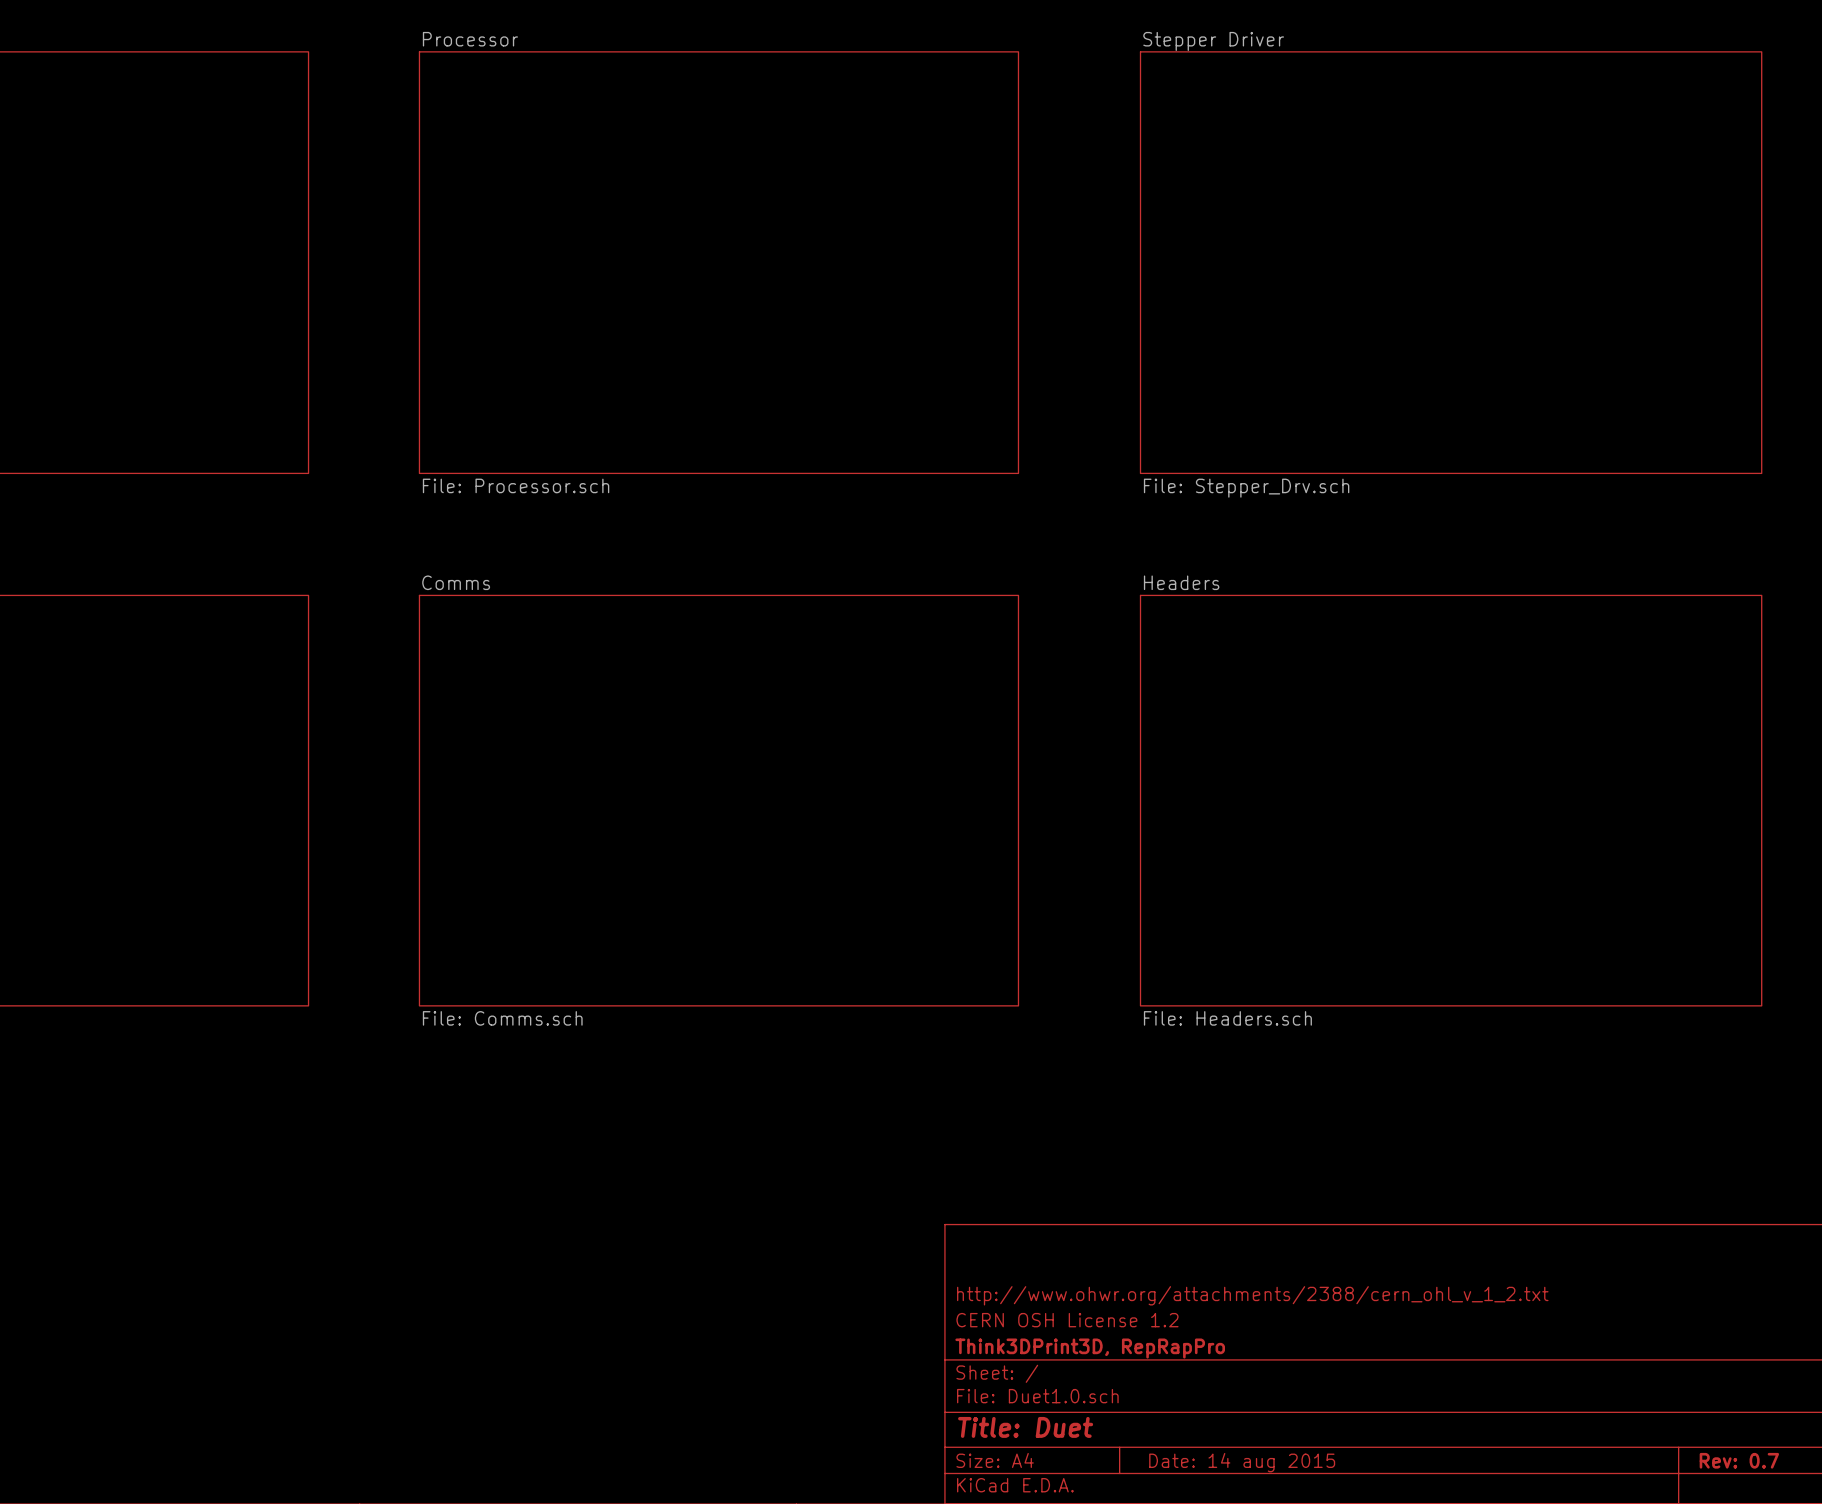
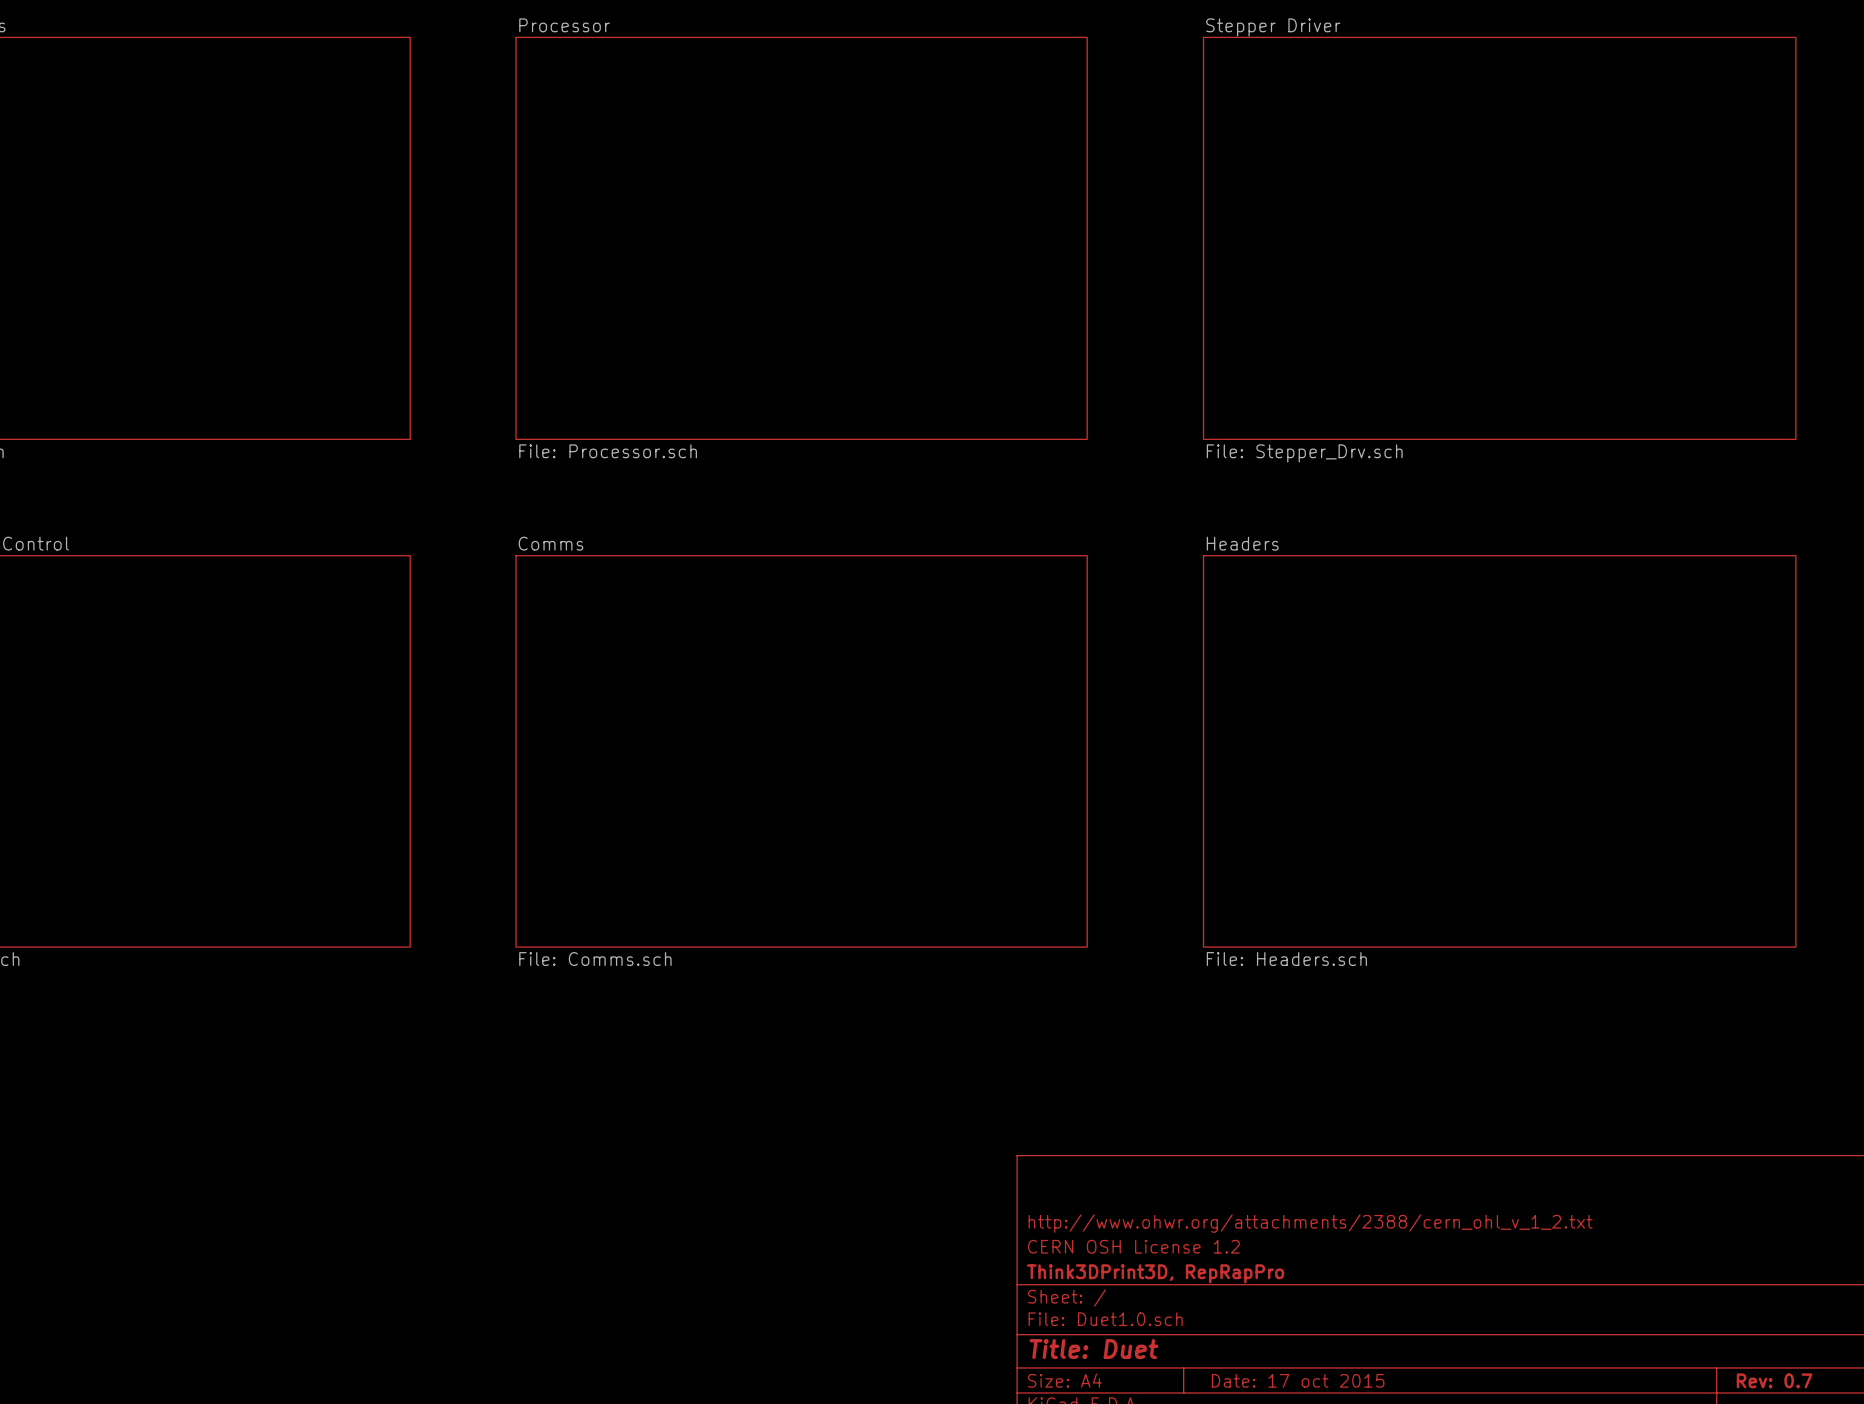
title block: Date: 14 aug 2015 (1242, 1462) -> Date: 17 oct 2015 (1298, 1380)

